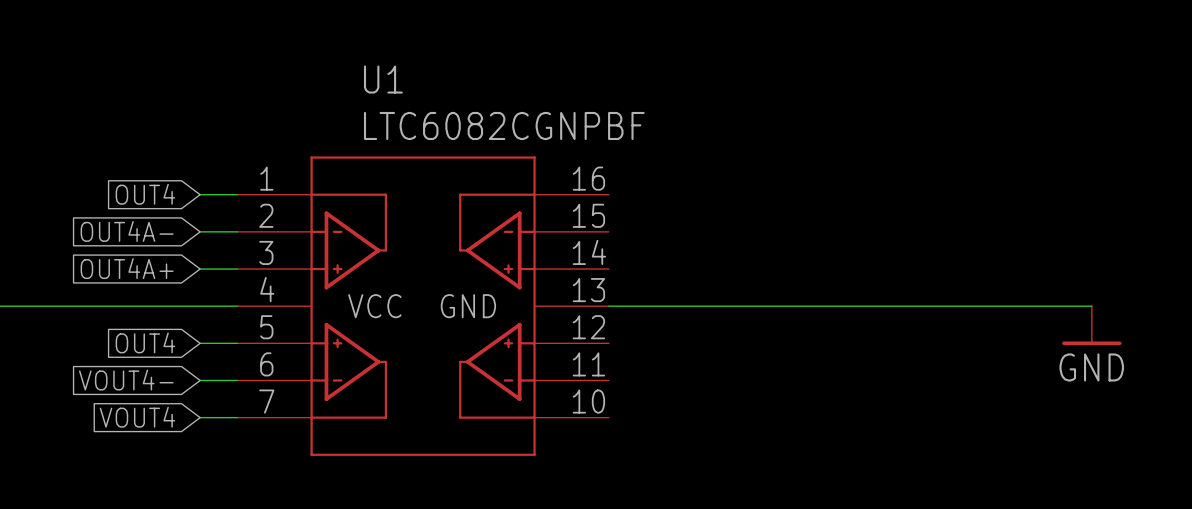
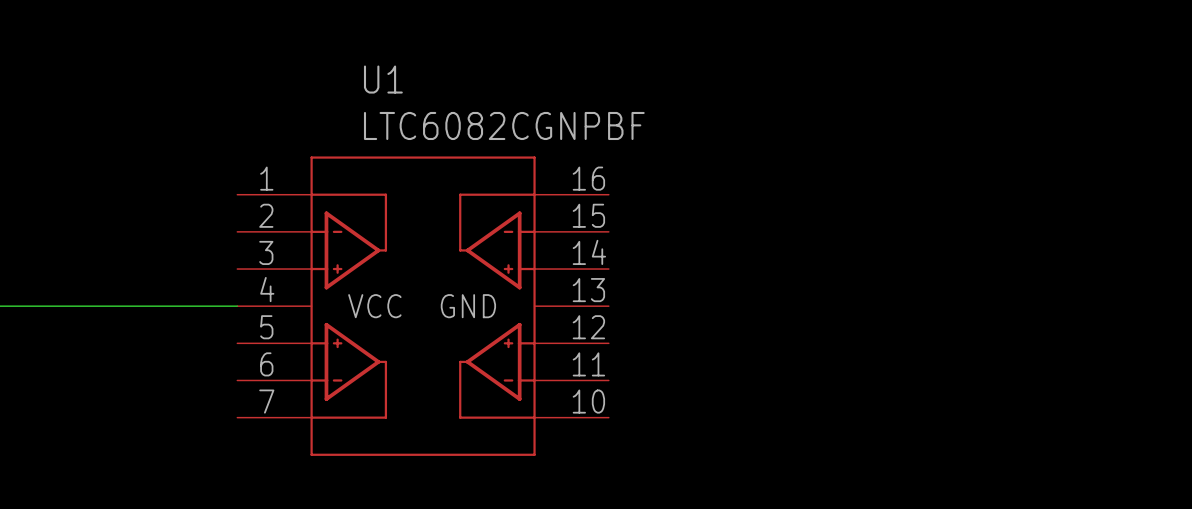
global label: OUT4 (145, 194) -> none
wire: (200, 194) (237, 194) -> none
global label: OUT4A- (127, 231) -> none
wire: (200, 231) (237, 231) -> none
global label: OUT4A+ (127, 268) -> none
wire: (200, 269) (237, 269) -> none
wire: (608, 306) (1091, 306) -> none
power symbol: GND (1091, 325) -> none
global label: OUT4 (145, 342) -> none
wire: (200, 343) (237, 343) -> none
global label: VOUT4- (126, 380) -> none
wire: (200, 380) (237, 380) -> none
global label: VOUT4 (137, 417) -> none
wire: (200, 417) (237, 417) -> none

